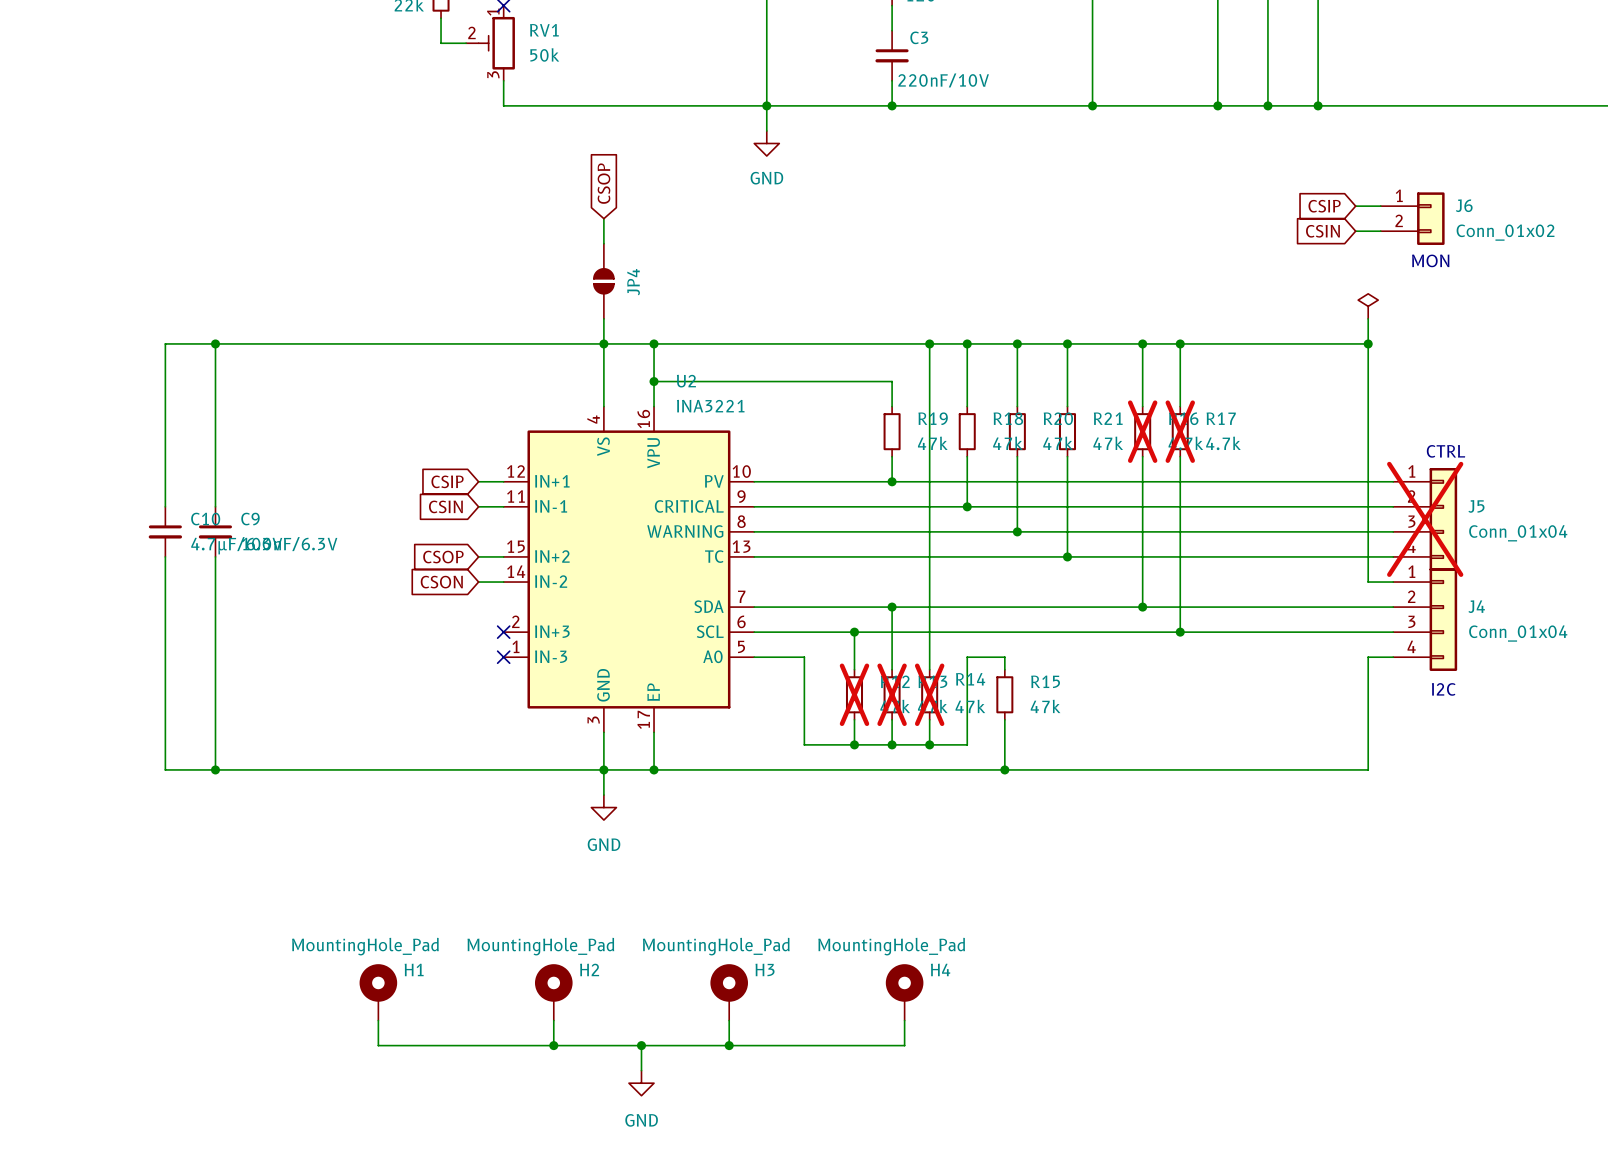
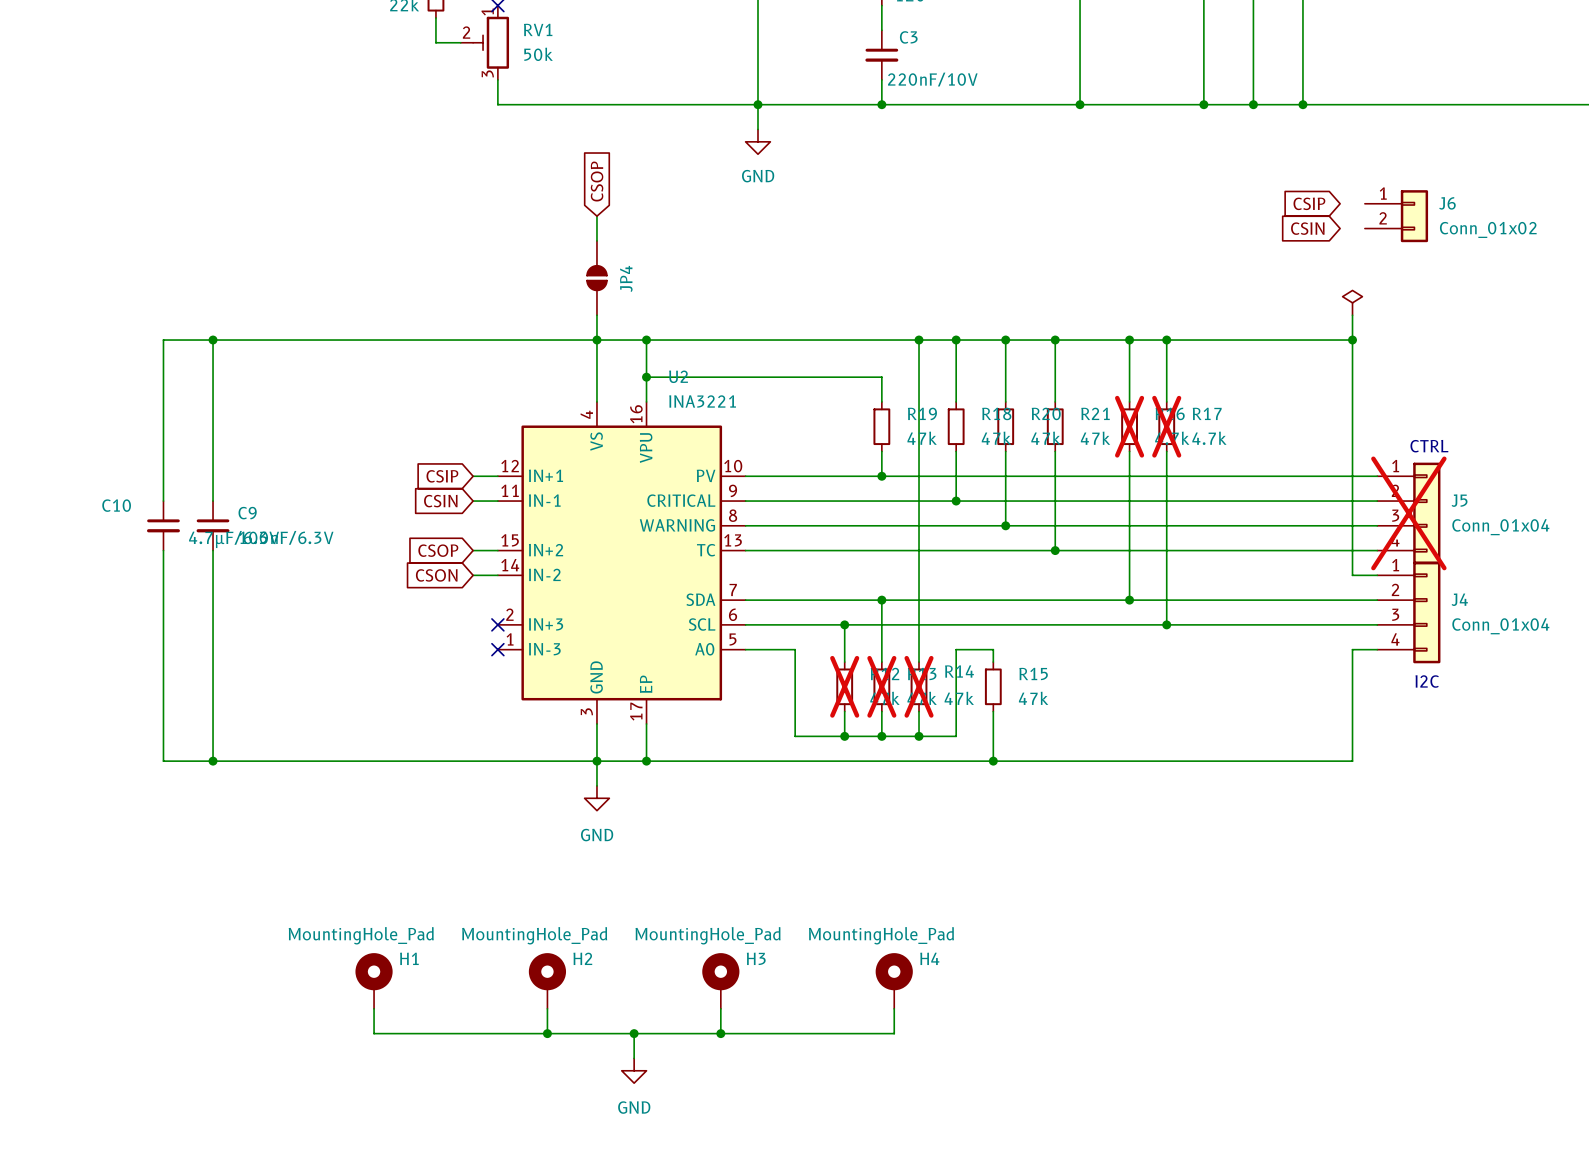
wire: (1355, 206) (1380, 206) -> none
wire: (1355, 231) (1380, 231) -> none
text: MON (1430, 260) -> none
C10 name position: C10 (205, 519) -> C10 (116, 505)

